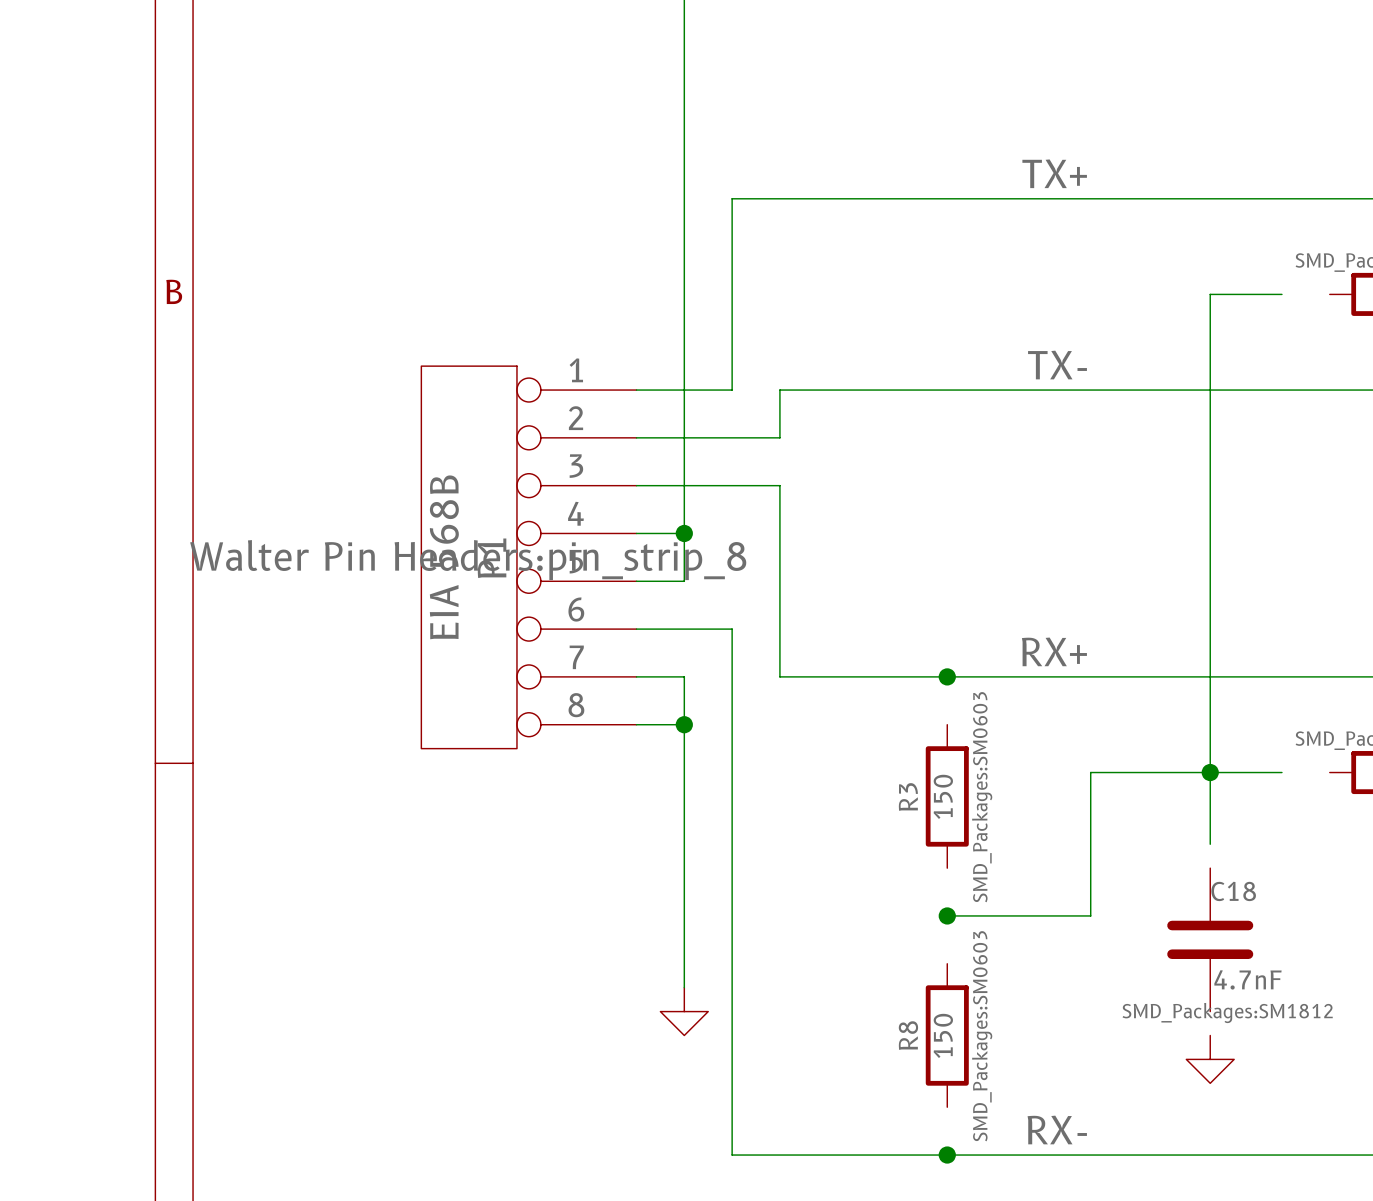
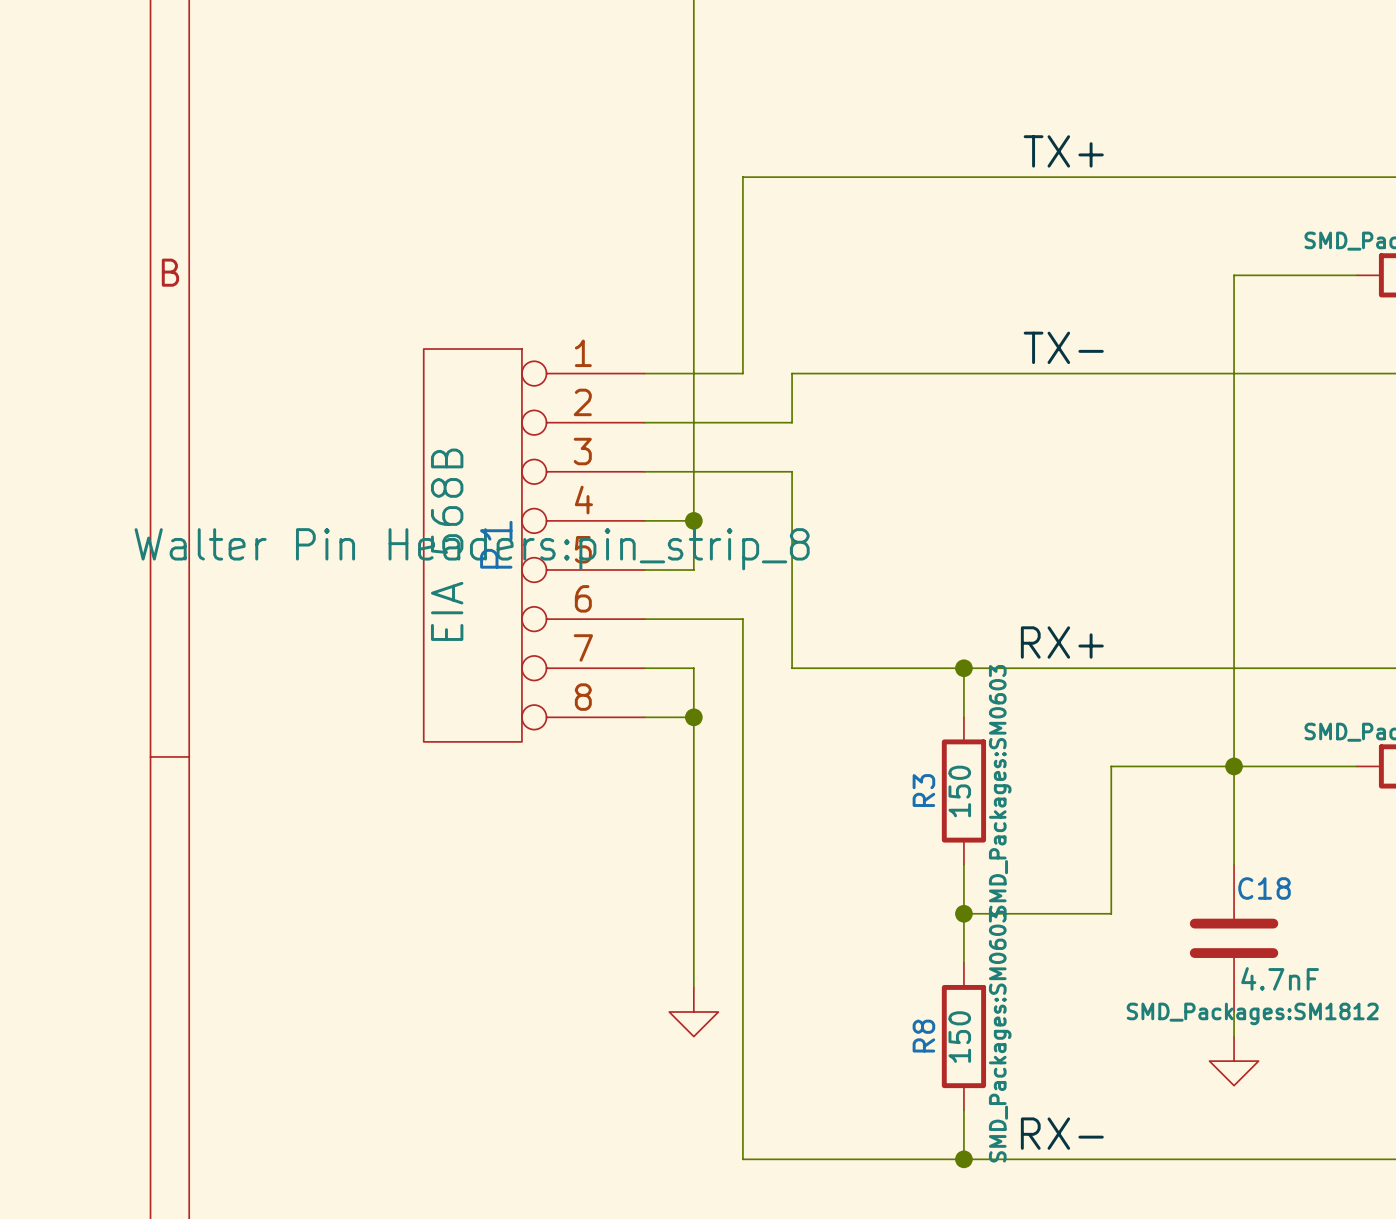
wire: none -> (1307, 275) (1356, 275)
wire: none -> (963, 668) (963, 717)
wire: none -> (1307, 766) (1356, 766)
wire: none -> (1234, 840) (1234, 864)
wire: none -> (963, 864) (963, 962)
wire: none -> (1234, 1012) (1234, 1036)
wire: none -> (963, 1110) (963, 1159)

